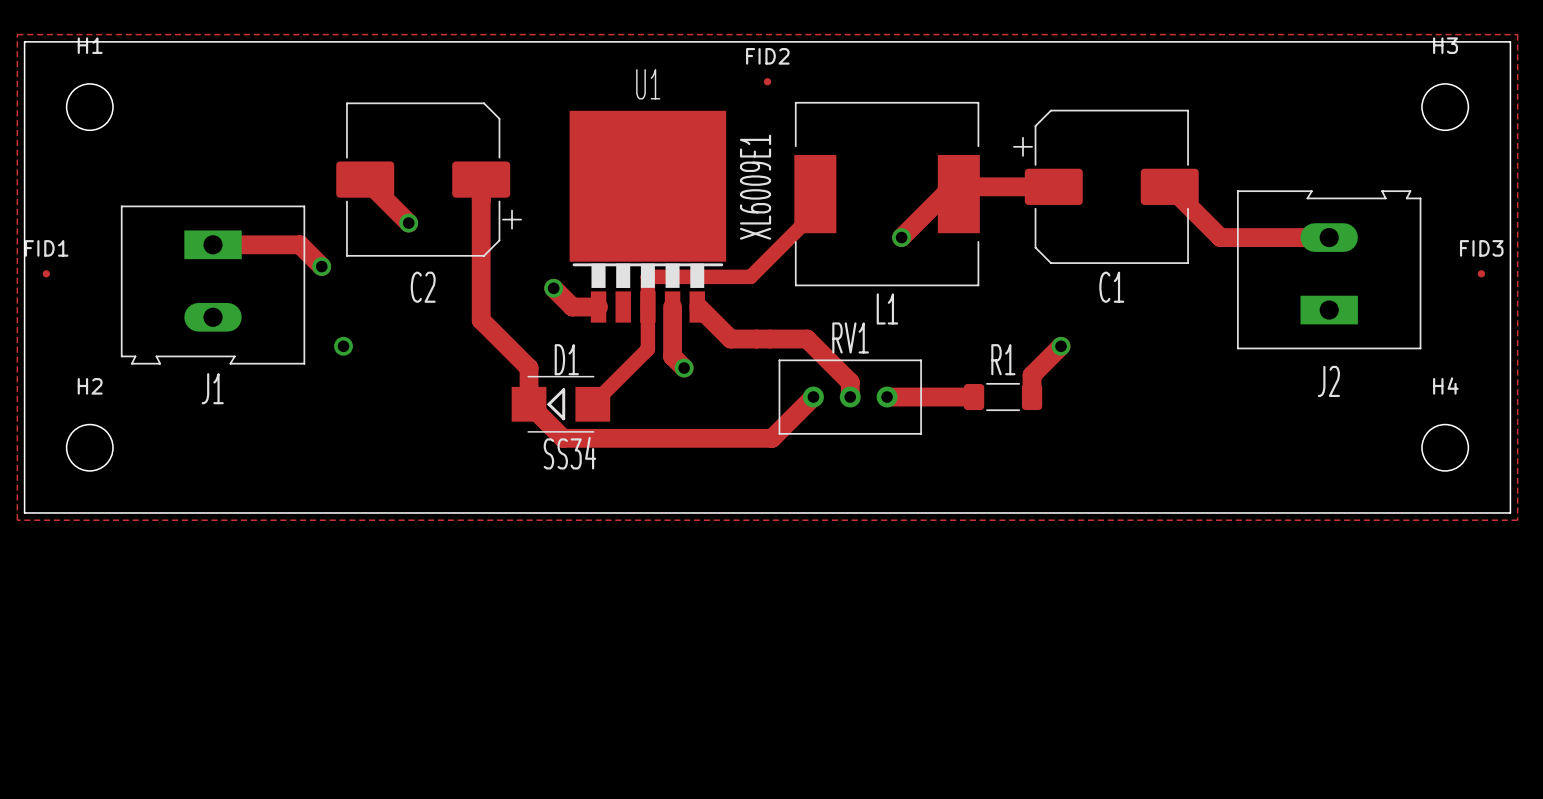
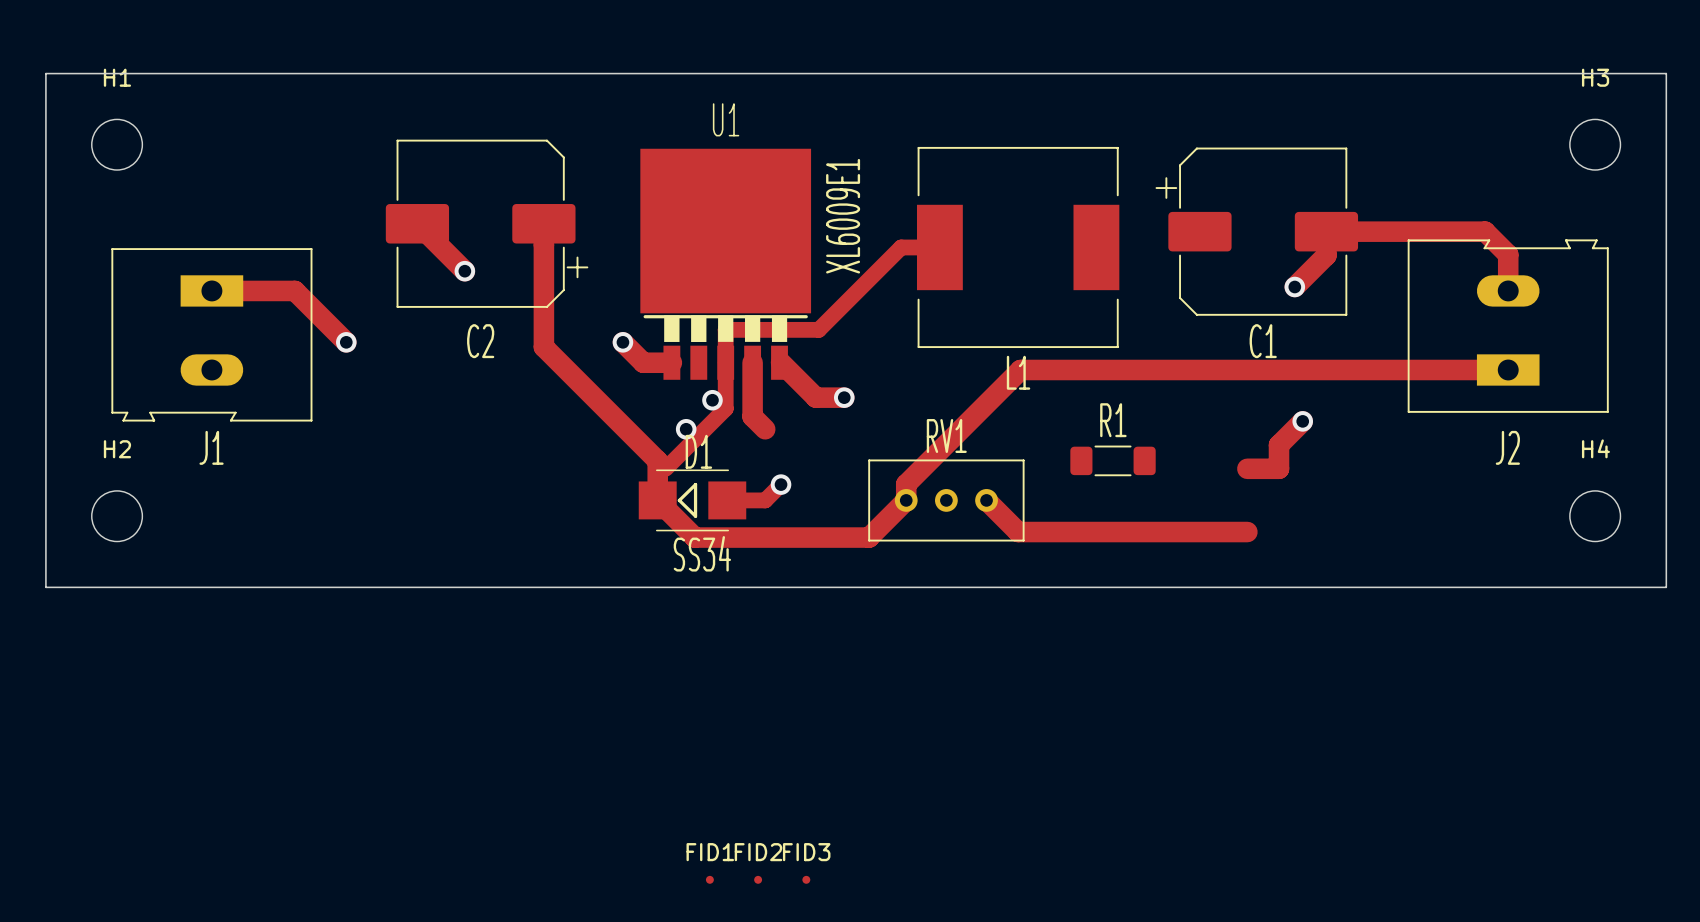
zone outline: (17, 34) (1517, 34) (1517, 520) (17, 520) (17, 34) -> none
FID2 position: (767, 81) -> (758, 879)
track: (1053, 186) (966, 186) (958, 194) (945, 194) (901, 237) -> none
C1 position: (1105, 186) -> (1256, 231)
track: (1169, 186) (1220, 237) (1329, 237) -> none
U1 value position: XL6009E1 (755, 187) -> XL6009E1 (843, 216)
track: (815, 194) (815, 212) (750, 276) (733, 276) -> (939, 247) (901, 247) (818, 329)
L1 position: (887, 194) -> (1018, 247)
via: (901, 237) -> none
track: none -> (1294, 287) (1326, 255) (1326, 231) (1485, 231) (1508, 254) (1508, 290)
via: none -> (1294, 287)
track: none -> (211, 290) (294, 290) (346, 342)
track: (213, 244) (300, 244) (321, 266) -> none
via position: (321, 266) -> (346, 342)
J2 position: (1329, 269) -> (1508, 326)
FID1 position: (46, 273) -> (709, 879)
FID3 position: (1481, 273) -> (806, 879)
J1 position: (213, 285) -> (211, 334)
track: (481, 292) (481, 320) (529, 368) (529, 404) (563, 438) (772, 438) (813, 397) -> (543, 347) (657, 460) (657, 500) (694, 537) (869, 537) (906, 500) (906, 484) (1020, 369) (1508, 369)
track: (756, 339) (807, 339) (850, 382) (850, 397) -> none
via: none -> (844, 397)
via: none -> (712, 400)
via: (343, 346) -> none
track: (1061, 346) (1032, 375) (1032, 397) -> none
via: (1061, 346) -> none
track: none -> (1302, 421) (1279, 445) (1279, 468) (1247, 468)
via: none -> (1302, 421)
via: none -> (686, 429)
via: (684, 368) -> none
RV1 position: (850, 397) -> (946, 500)
track: (887, 397) (974, 397) -> none
D1 position: (560, 404) -> (692, 500)
track: none -> (781, 484) (765, 500) (727, 500) (741, 486)
via: none -> (781, 484)
track: none -> (986, 500) (1018, 532) (1247, 532)

